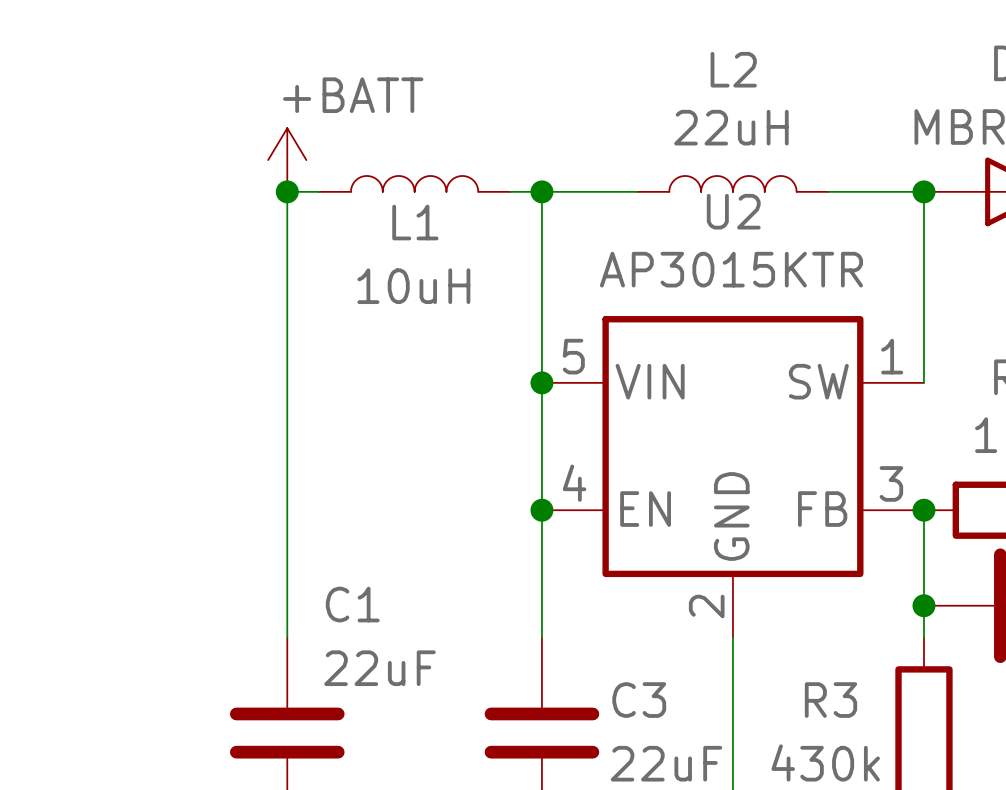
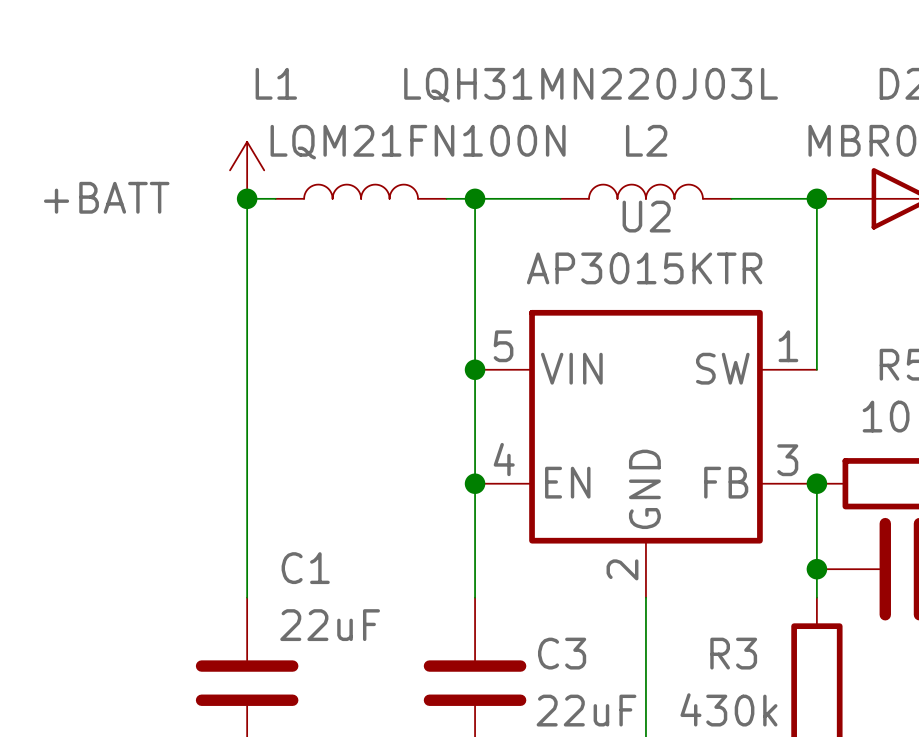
L2 name position: L2 (733, 69) -> L2 (646, 140)
power symbol text position: +BATT (353, 95) -> +BATT (106, 197)
L2 value: 22uH (731, 127) -> LQH31MN220J03L (591, 85)
L1 name position: L1 (415, 222) -> L1 (276, 83)
L1 value: 10uH (413, 286) -> LQM21FN100N (418, 142)

